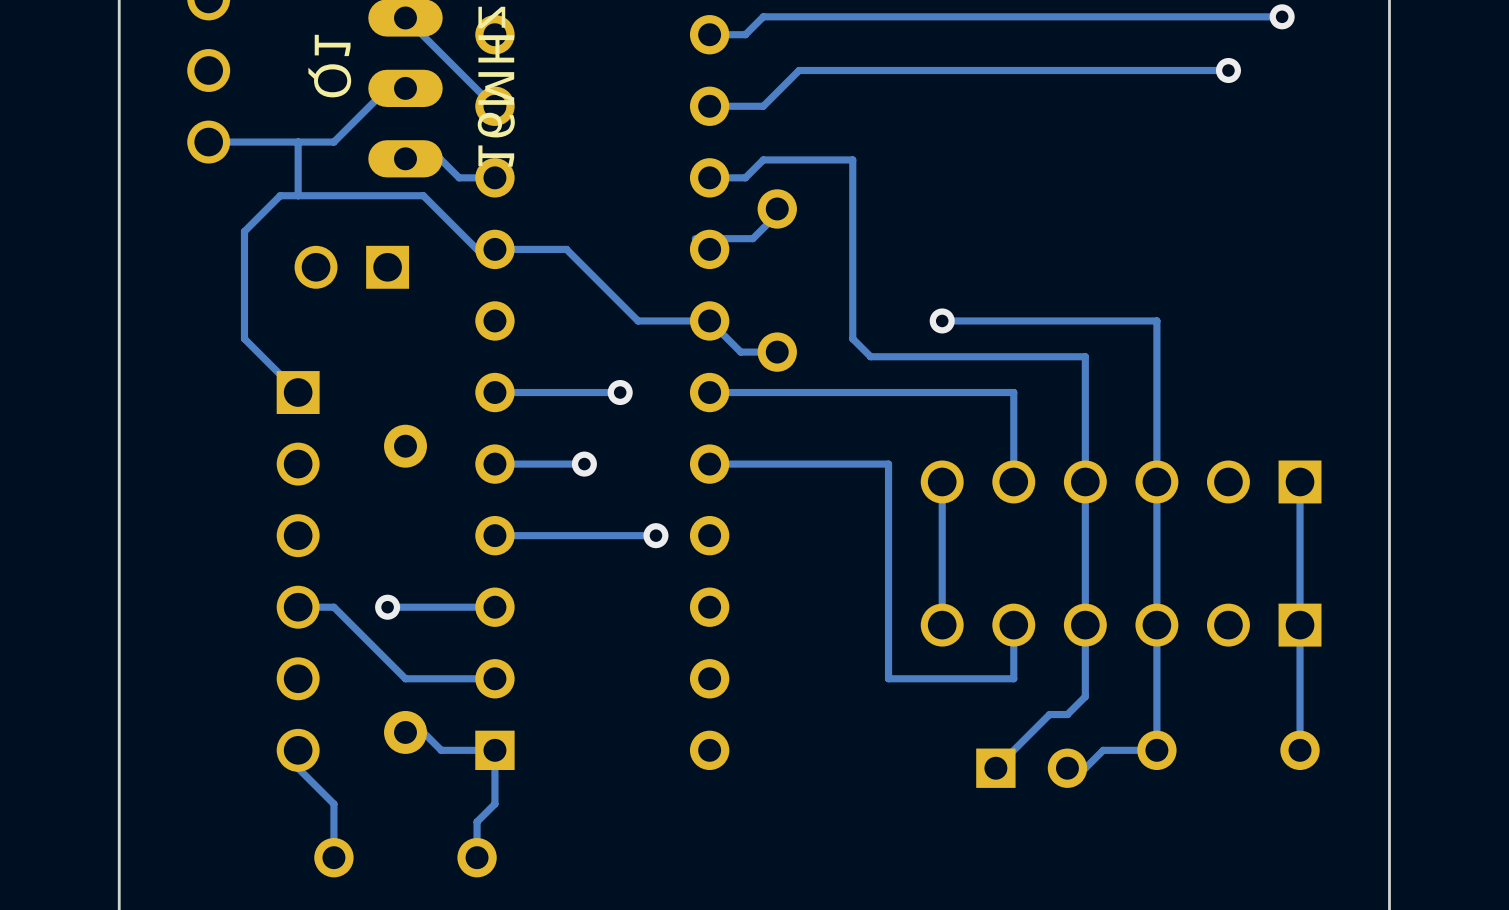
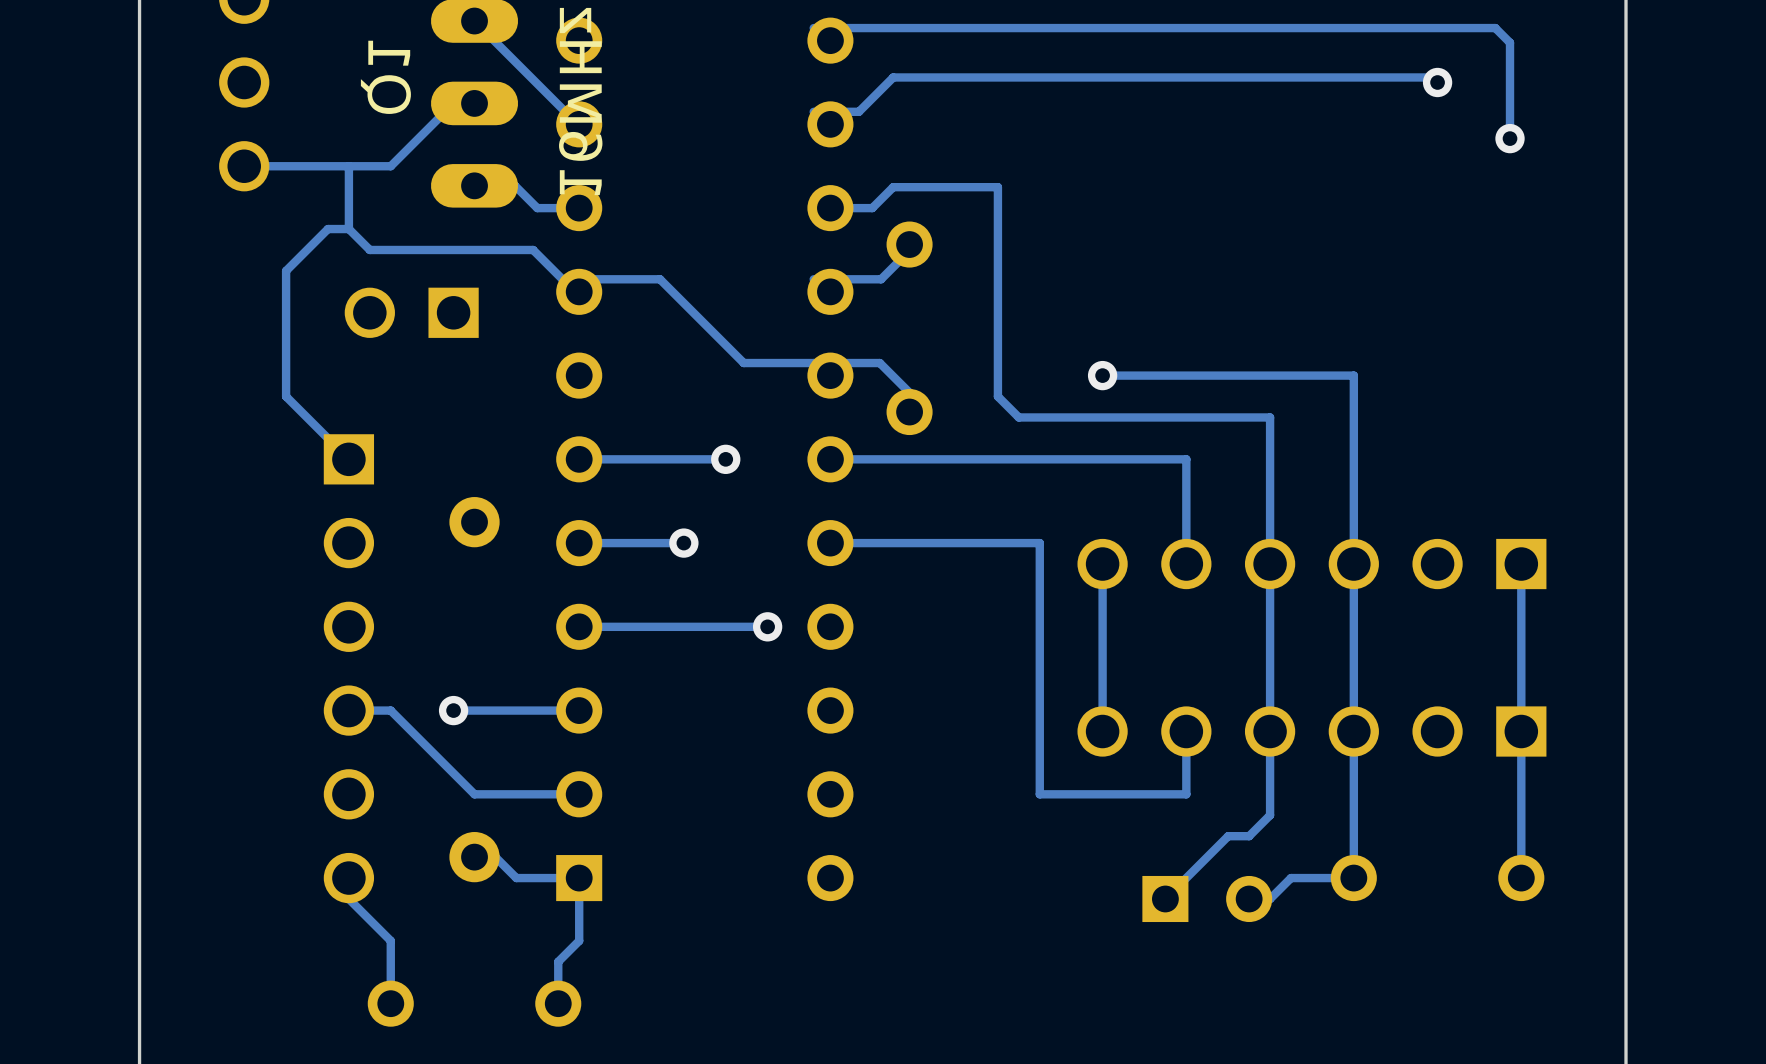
track: (1282, 16) (763, 16) (745, 34) (709, 34) -> none
via: (1282, 16) -> none
track: none -> (813, 28) (1495, 28) (1510, 42) (1510, 138)
track: none -> (1438, 77) (893, 77) (858, 111) (813, 111)
track: (1228, 70) (799, 70) (763, 106) (709, 106) -> none
via: none -> (1510, 138)
track: (298, 195) (423, 195) (477, 249) (566, 249) (638, 320) (709, 320) (740, 352) (777, 352) -> (348, 229) (369, 249) (533, 249) (562, 279) (660, 279) (743, 363) (879, 363) (909, 392) (909, 412)

